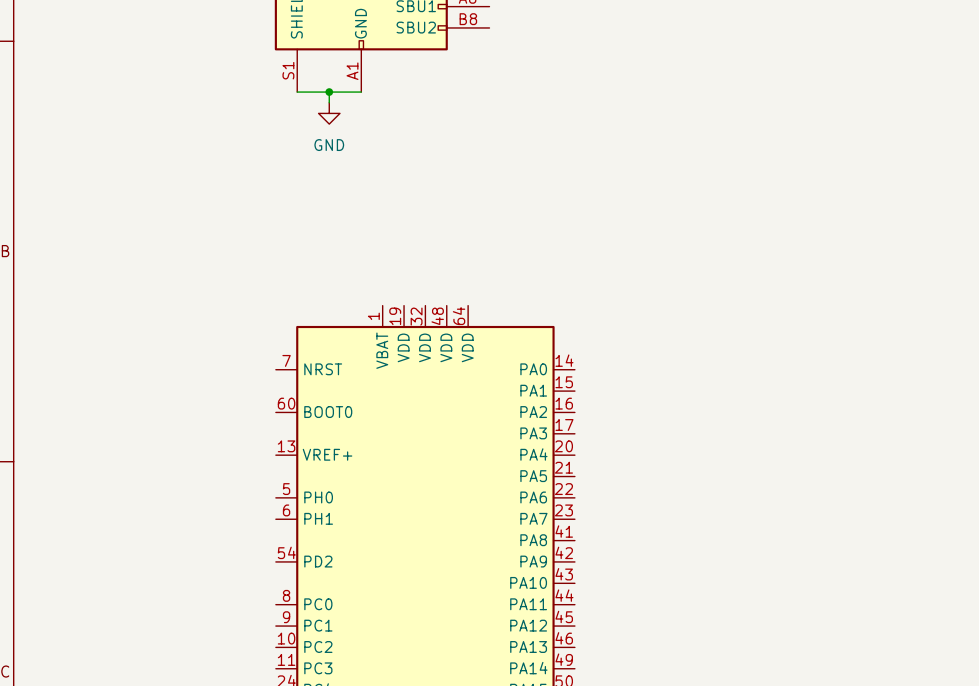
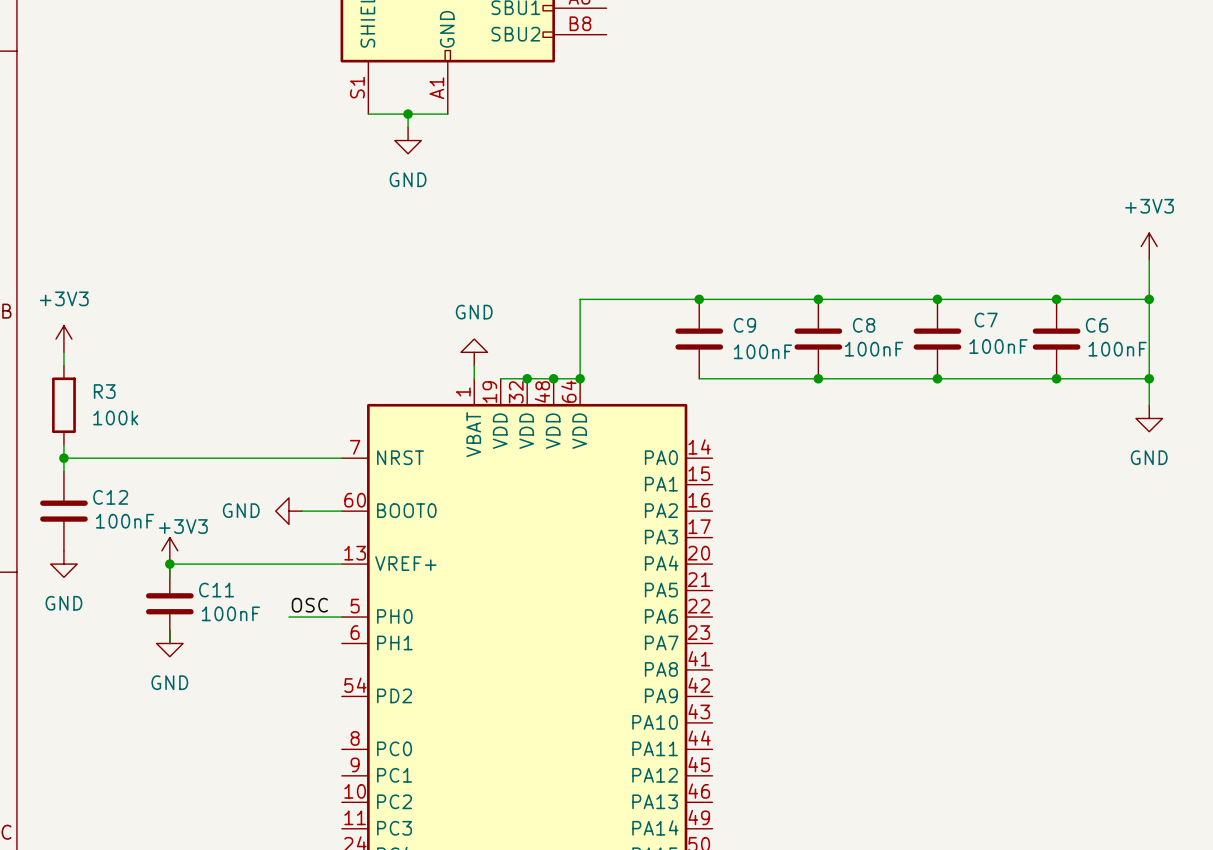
power symbol: none -> +3V3 (1149, 246)
wire: none -> (1149, 259) (1149, 405)
junction: none -> (699, 299)
junction: none -> (818, 299)
junction: none -> (937, 299)
junction: none -> (1056, 299)
wire: none -> (1149, 299) (580, 299) (580, 378) (500, 378)
junction: none -> (1149, 299)
power symbol: none -> +3V3 (63, 339)
C9: none -> 100nF (699, 339)
C8: none -> 100nF (818, 339)
C7: none -> 100nF (937, 339)
C6: none -> 100nF (1056, 339)
wire: none -> (63, 352) (63, 365)
power symbol: none -> GND (474, 352)
wire: none -> (474, 365) (474, 378)
junction: none -> (527, 378)
junction: none -> (553, 378)
junction: none -> (580, 378)
wire: none -> (699, 378) (1149, 378)
junction: none -> (818, 378)
junction: none -> (937, 378)
junction: none -> (1056, 378)
junction: none -> (1149, 378)
R3: none -> 100k (63, 405)
power symbol: none -> GND (1149, 418)
wire: none -> (63, 444) (63, 471)
wire: none -> (63, 458) (341, 458)
junction: none -> (63, 458)
C12: none -> 100nF (63, 511)
power symbol: none -> GND (288, 511)
wire: none -> (302, 511) (341, 511)
power symbol: none -> +3V3 (169, 550)
power symbol: none -> GND (63, 564)
junction: none -> (169, 564)
wire: none -> (341, 564) (169, 564) (169, 577)
C11: none -> 100nF (169, 603)
label: none -> OSC (309, 605)
wire: none -> (288, 617) (341, 617)
wire: none -> (169, 630) (169, 643)
power symbol: none -> GND (169, 643)

